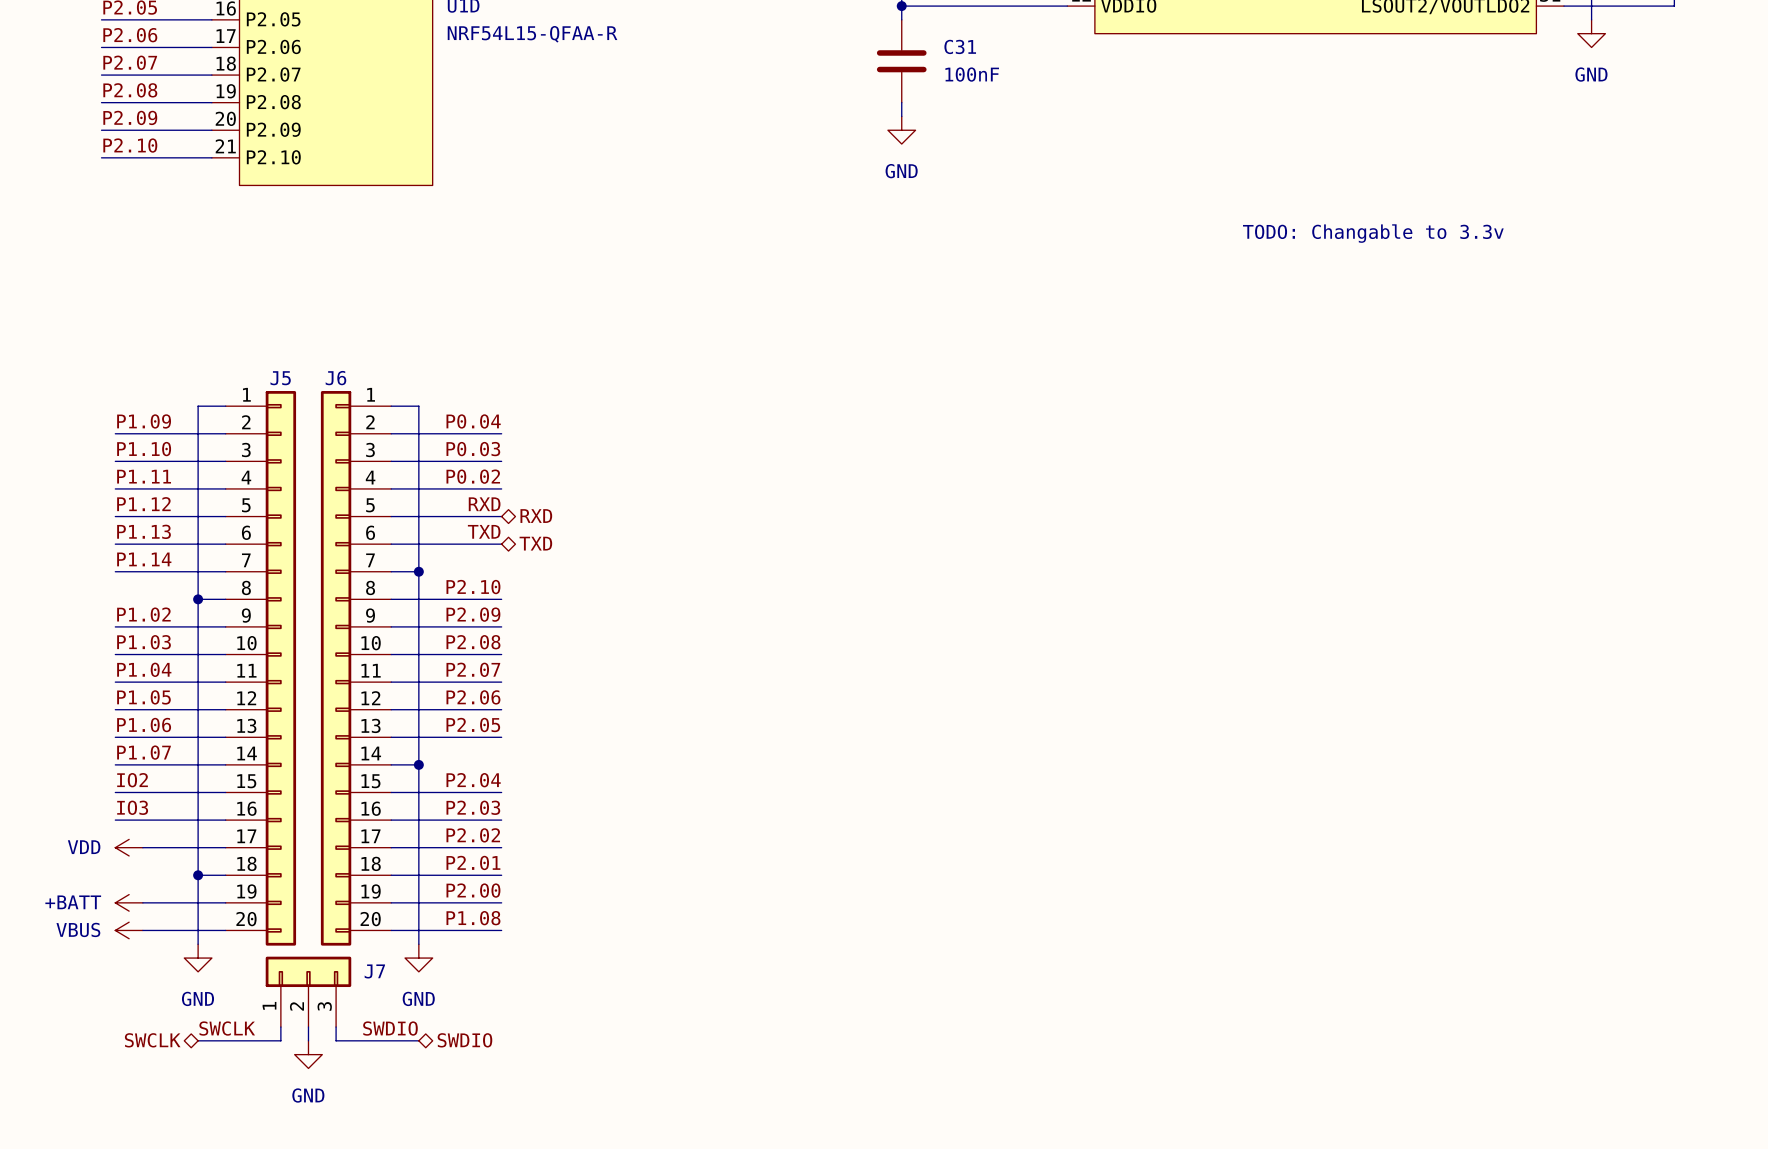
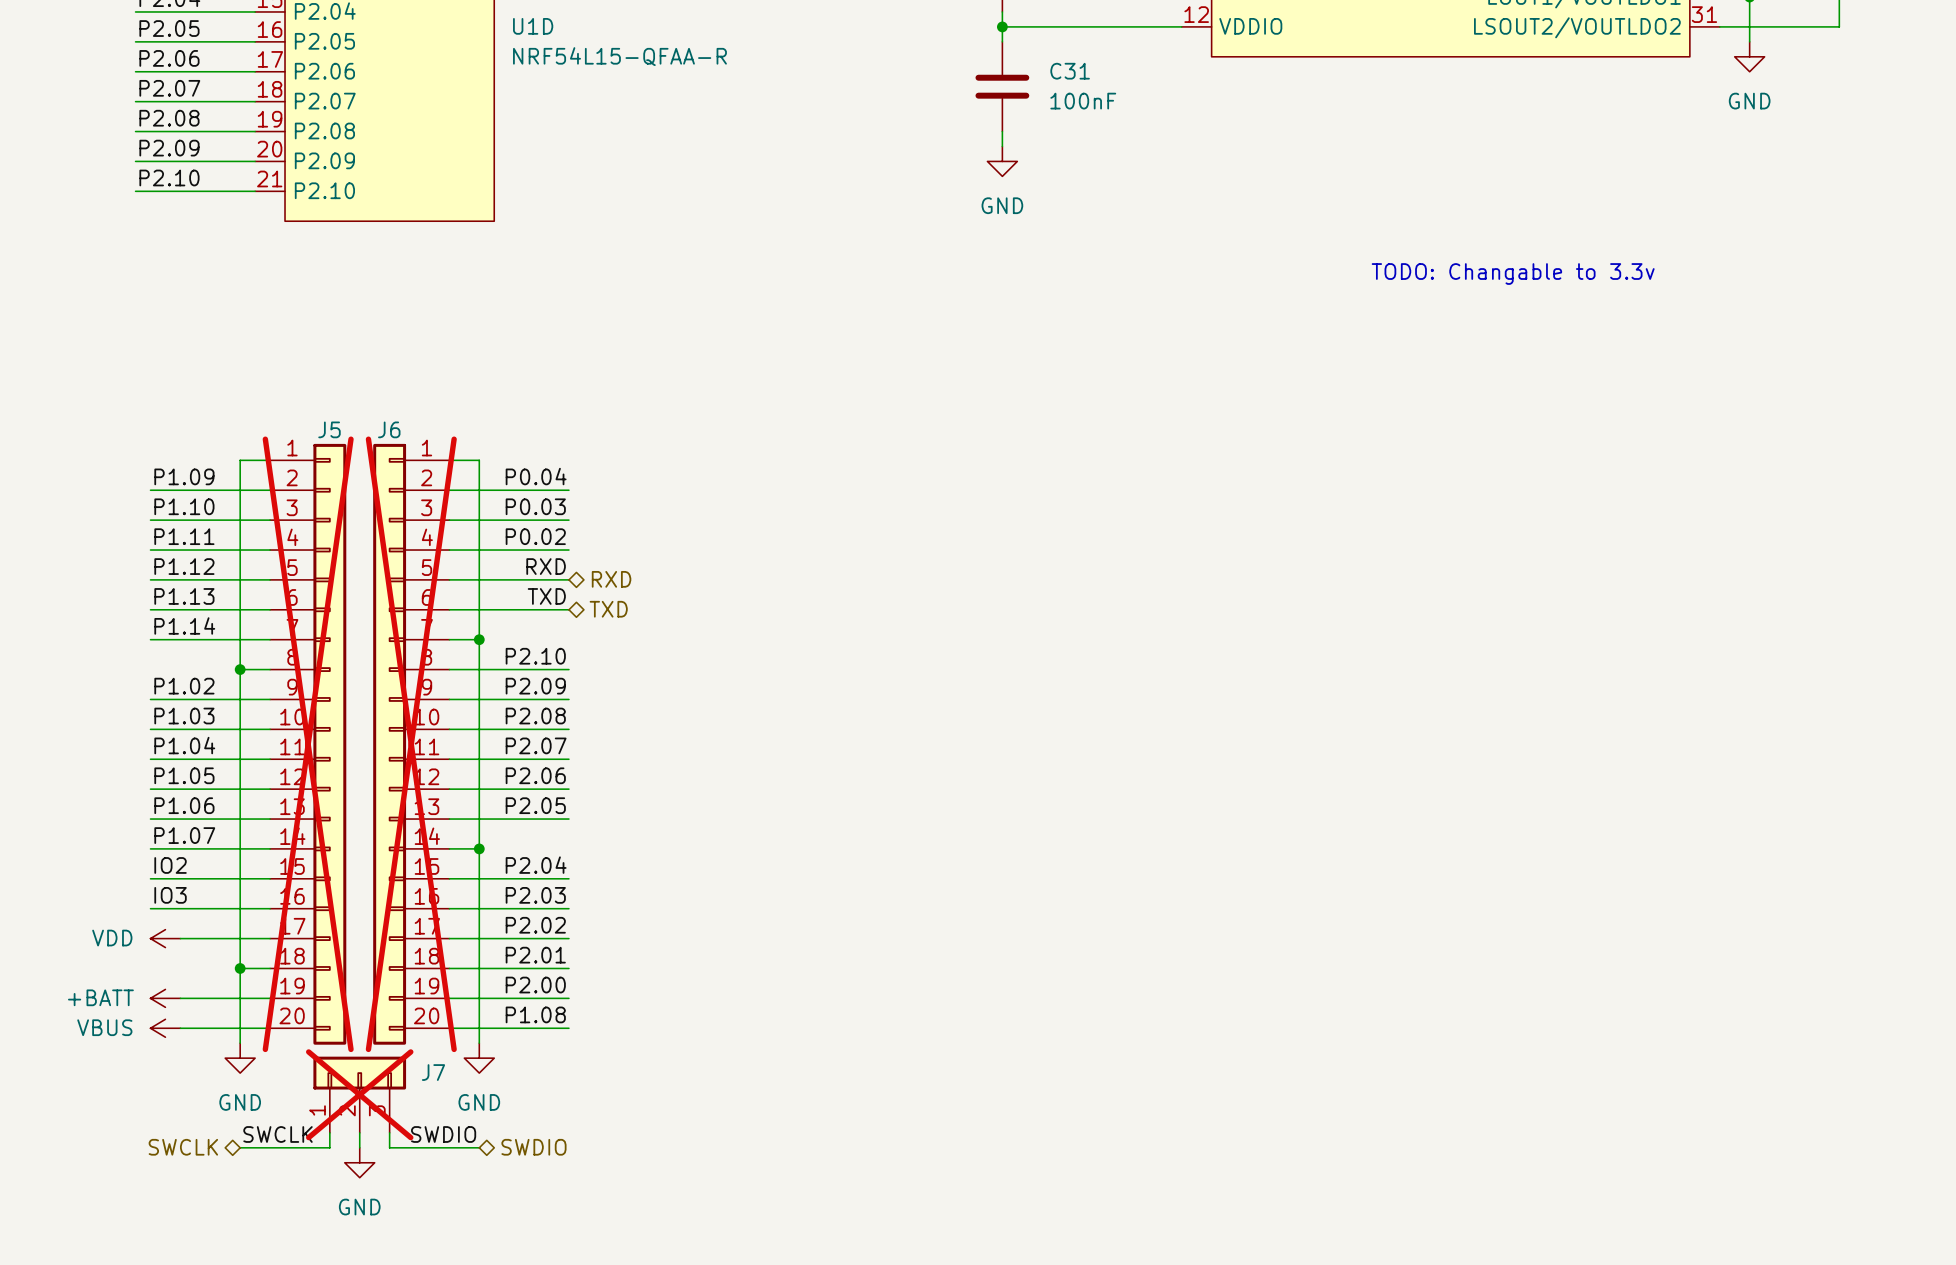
J5 do-not-place cross: none -> (308, 744)
J6 do-not-place cross: none -> (411, 744)
J7 do-not-place cross: none -> (359, 1094)

